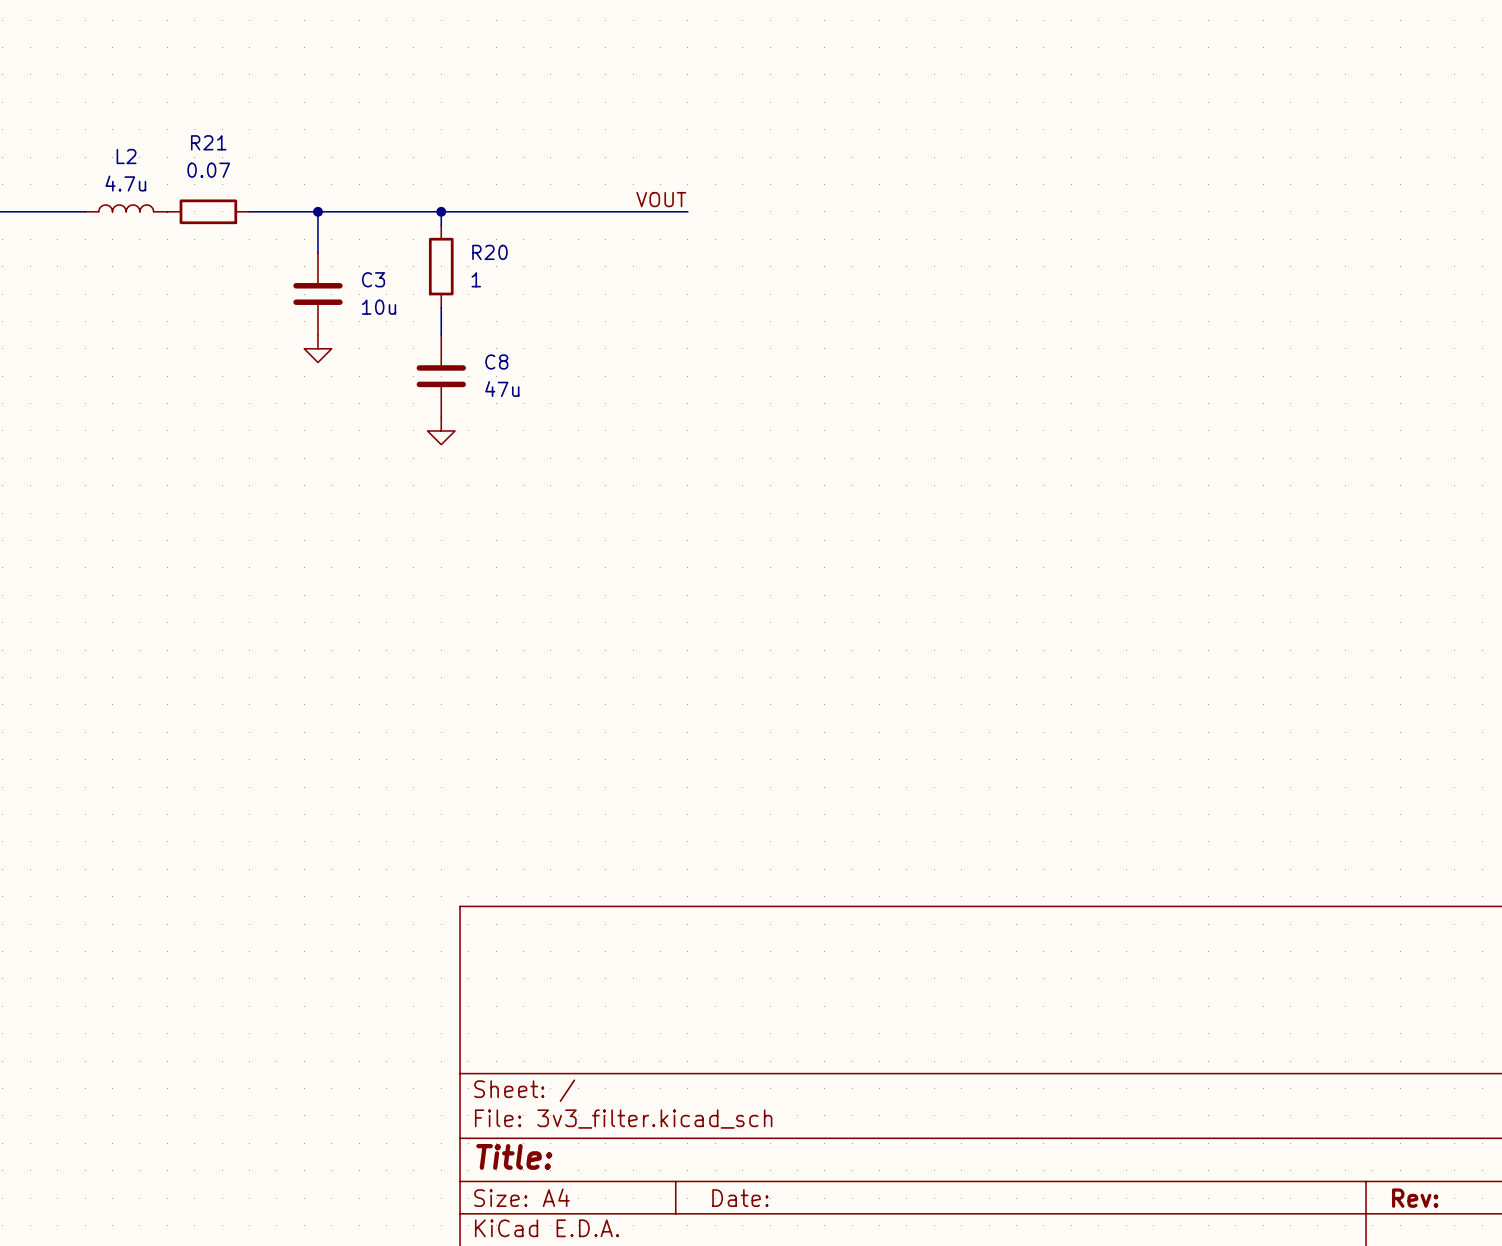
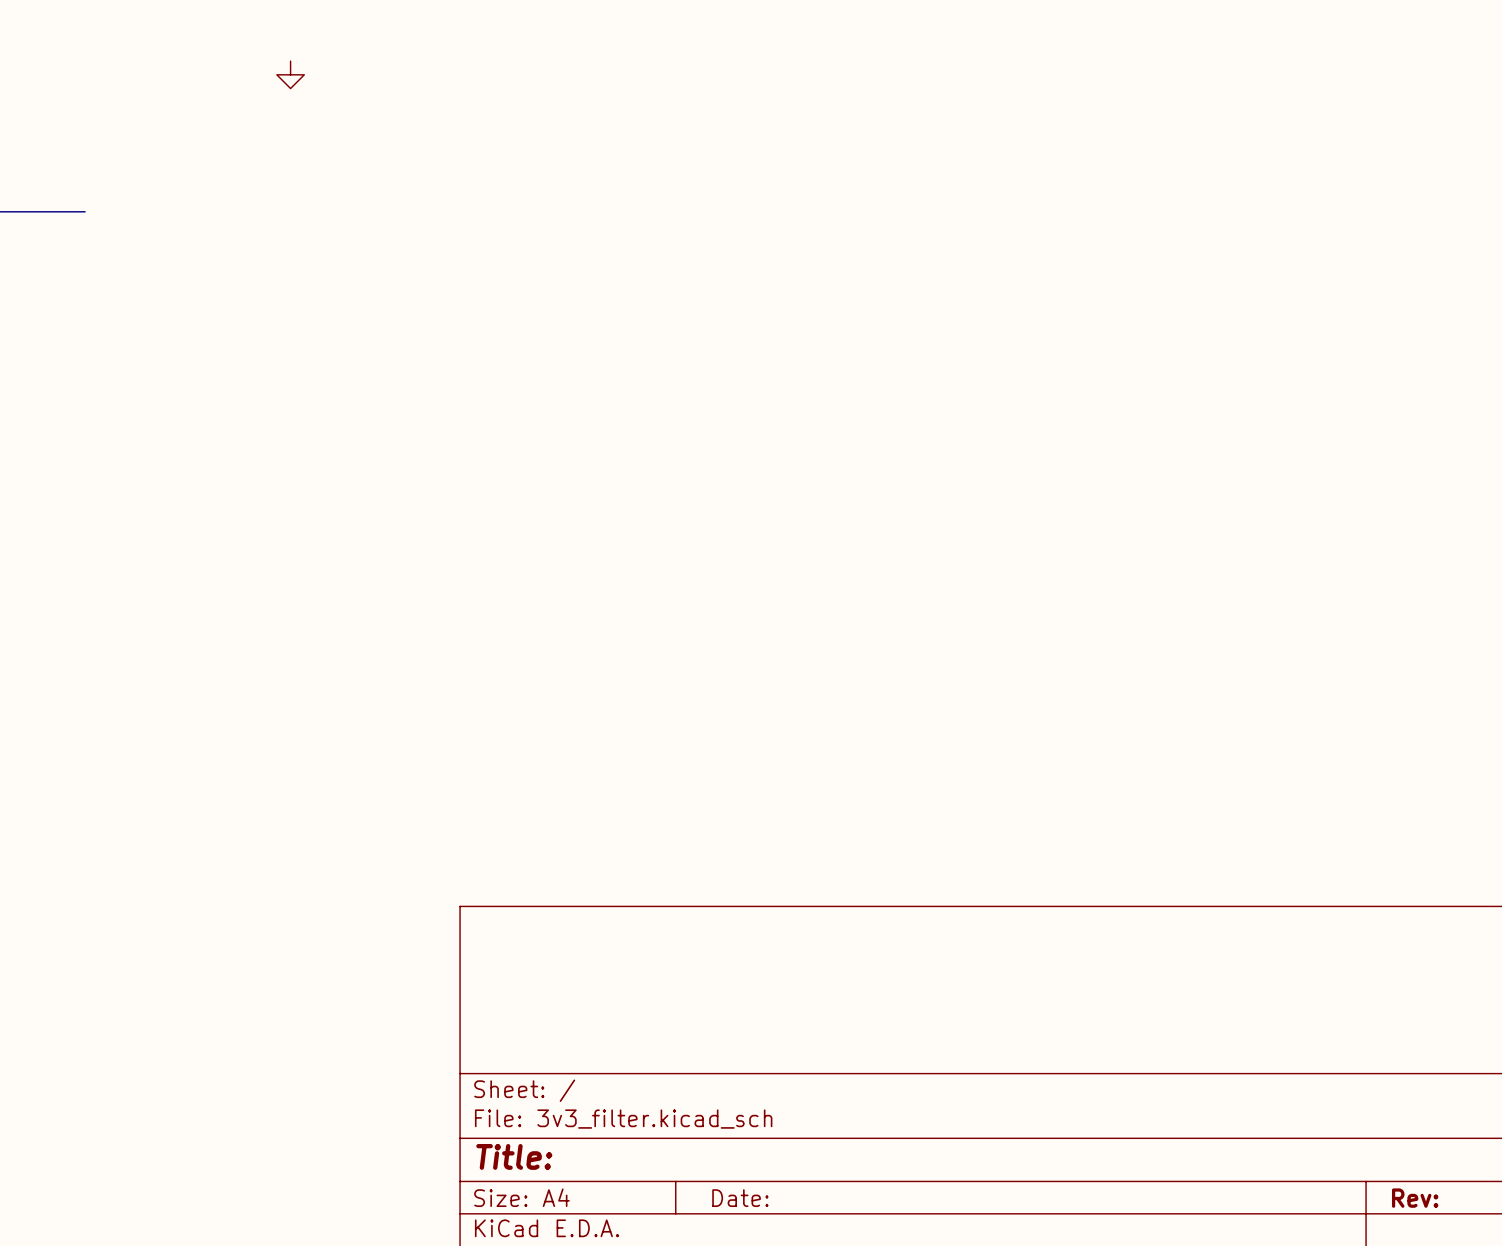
power symbol: none -> (290, 74)
label: VOUT (661, 199) -> none
L2: 4.7u (126, 208) -> none
R21: 0.07 (208, 211) -> none
wire: (249, 211) (687, 211) -> none
wire: (317, 211) (317, 252) -> none
junction: (317, 211) -> none
wire: (441, 211) (441, 225) -> none
junction: (441, 211) -> none
R20: 1 (441, 266) -> none
C3: 10u (317, 294) -> none
wire: (441, 307) (441, 335) -> none
power symbol: (317, 348) -> none
C8: 47u (441, 376) -> none
power symbol: (441, 430) -> none

